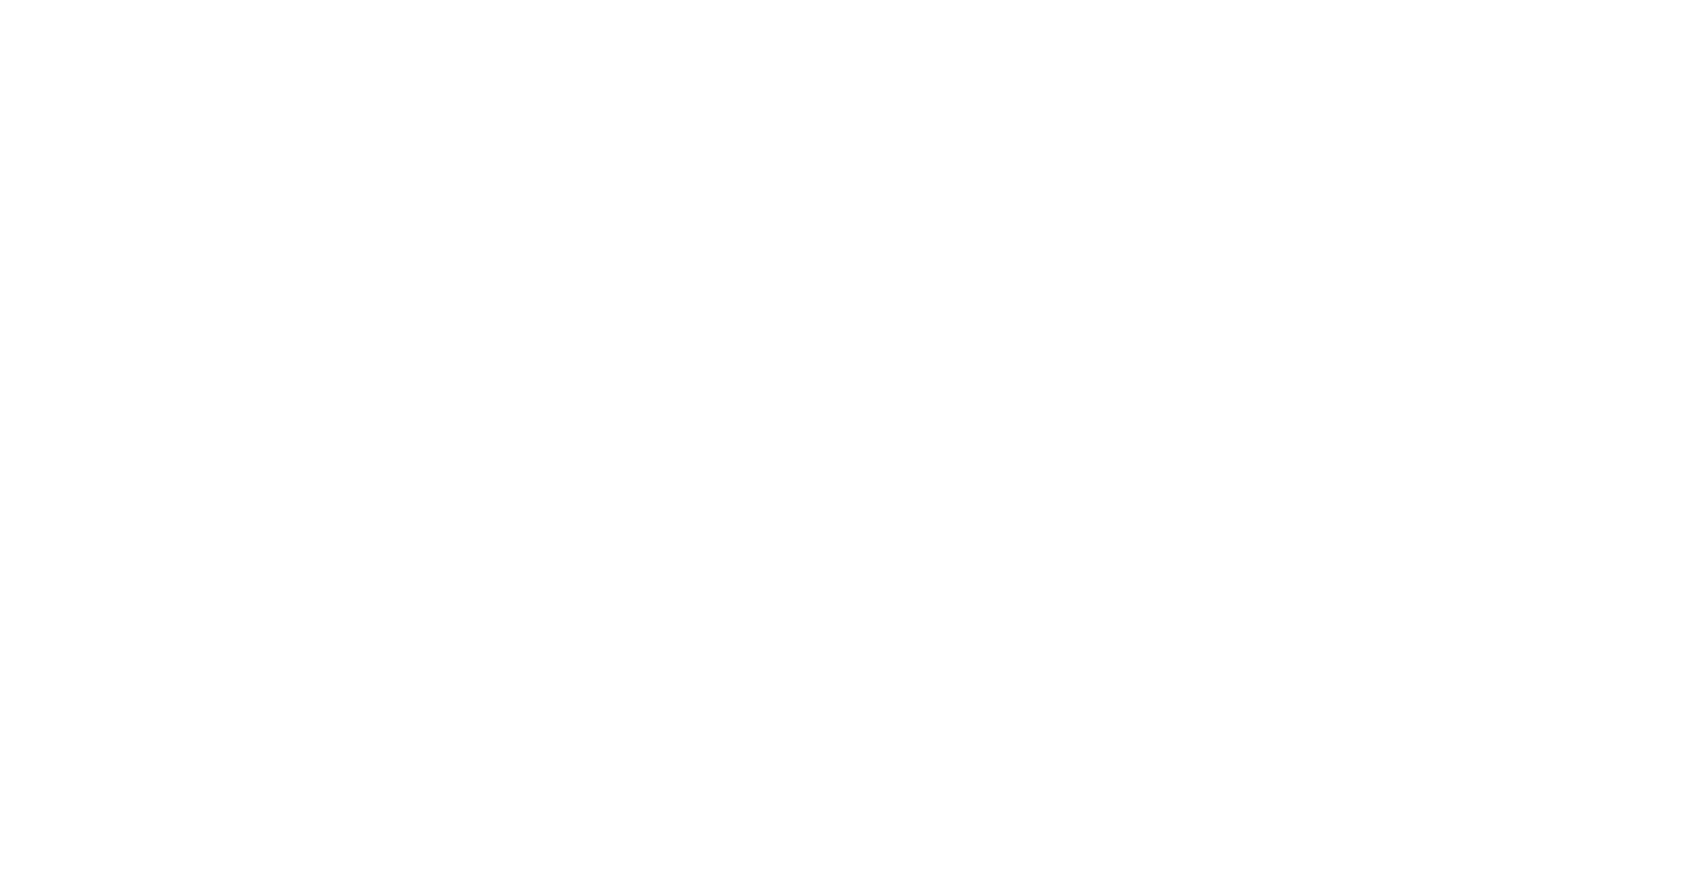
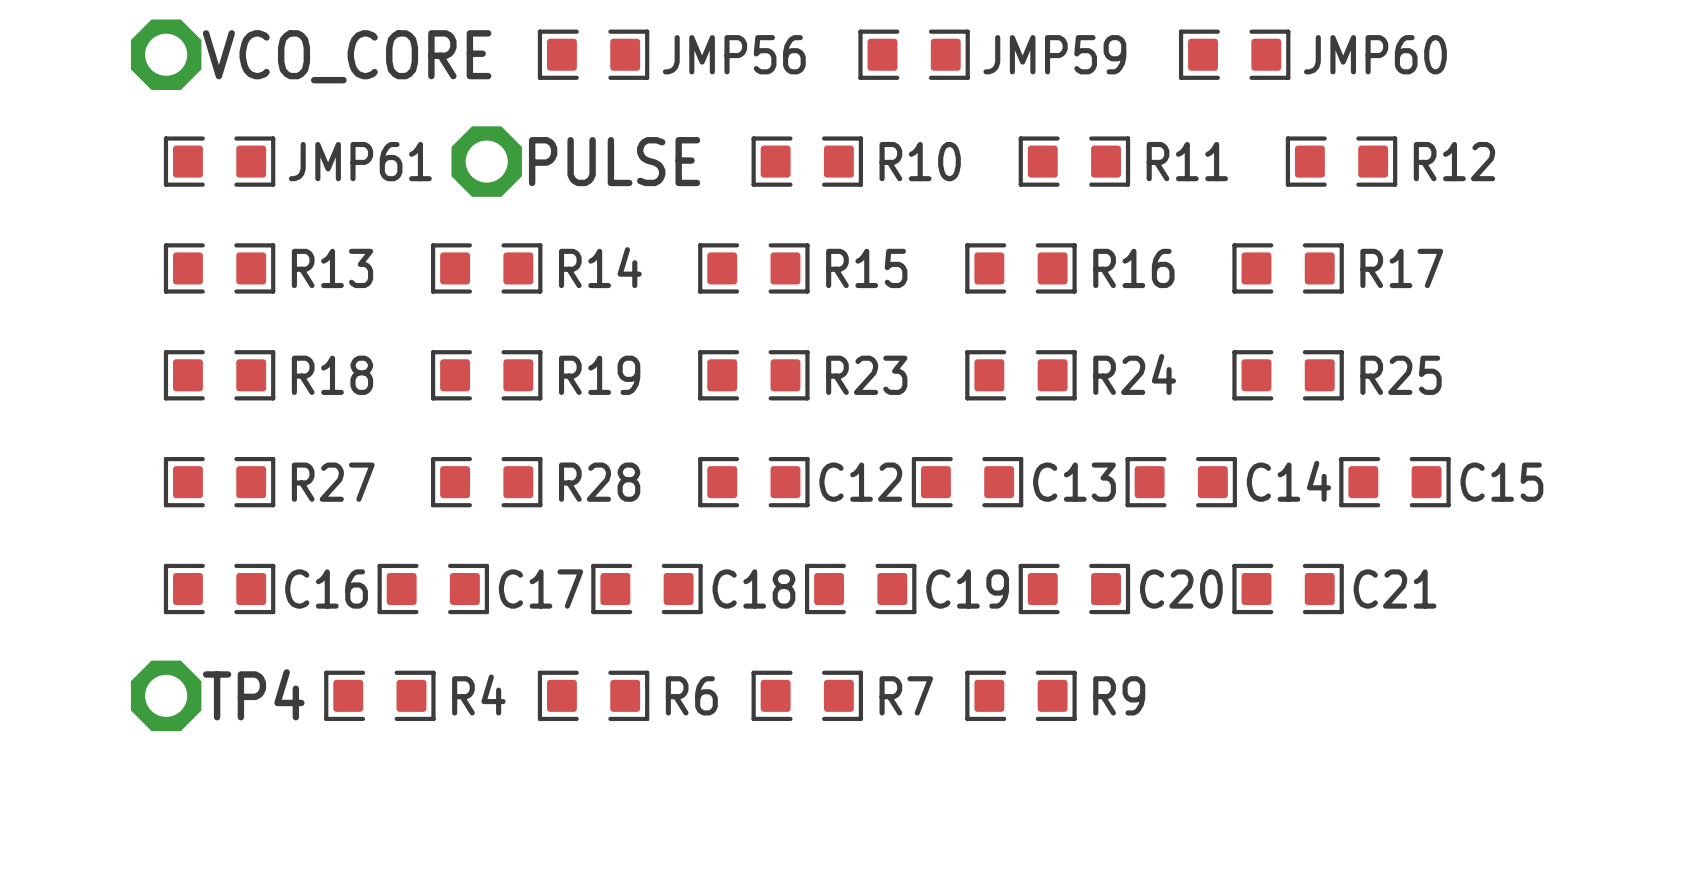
VCO_CORE: none -> (166, 54)
JMP56: none -> (593, 54)
JMP59: none -> (914, 54)
JMP60: none -> (1234, 54)
JMP61: none -> (219, 161)
PULSE: none -> (486, 161)
R10: none -> (807, 161)
R11: none -> (1074, 161)
R12: none -> (1341, 161)
R13: none -> (219, 268)
R14: none -> (486, 268)
R15: none -> (753, 268)
R16: none -> (1020, 268)
R17: none -> (1288, 268)
R18: none -> (219, 375)
R19: none -> (486, 375)
R23: none -> (753, 375)
R24: none -> (1020, 375)
R25: none -> (1288, 375)
R27: none -> (219, 482)
R28: none -> (486, 482)
C12: none -> (753, 482)
C13: none -> (967, 482)
C14: none -> (1181, 482)
C15: none -> (1394, 482)
C16: none -> (219, 589)
C17: none -> (433, 589)
C18: none -> (646, 589)
C19: none -> (860, 589)
C20: none -> (1074, 589)
C21: none -> (1288, 589)
TP4: none -> (166, 695)
R4: none -> (379, 695)
R6: none -> (593, 695)
R7: none -> (807, 695)
R9: none -> (1020, 695)

